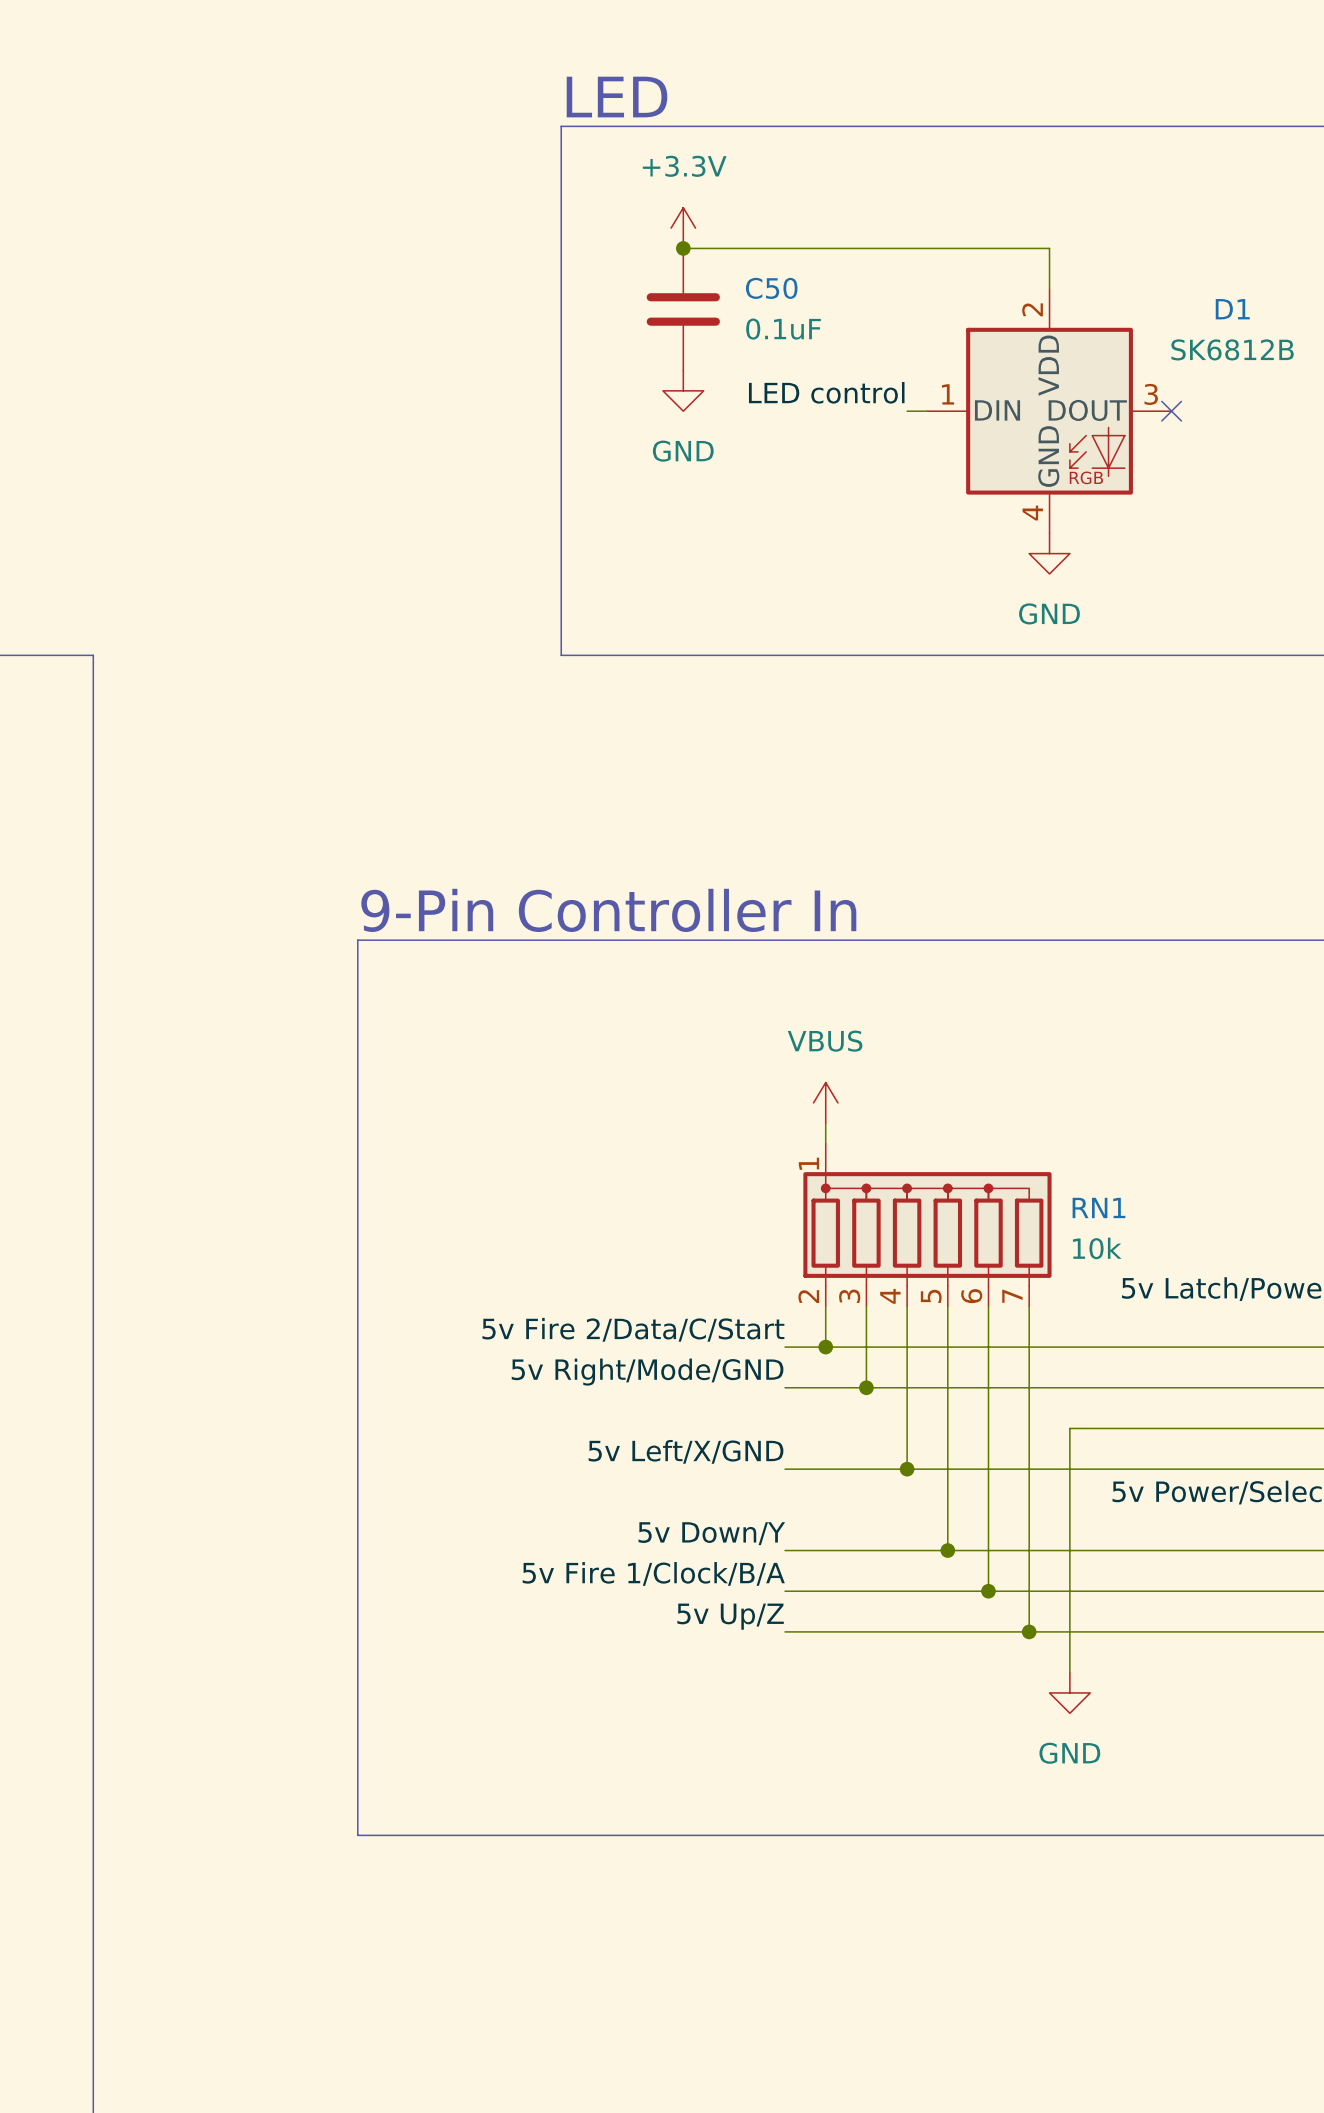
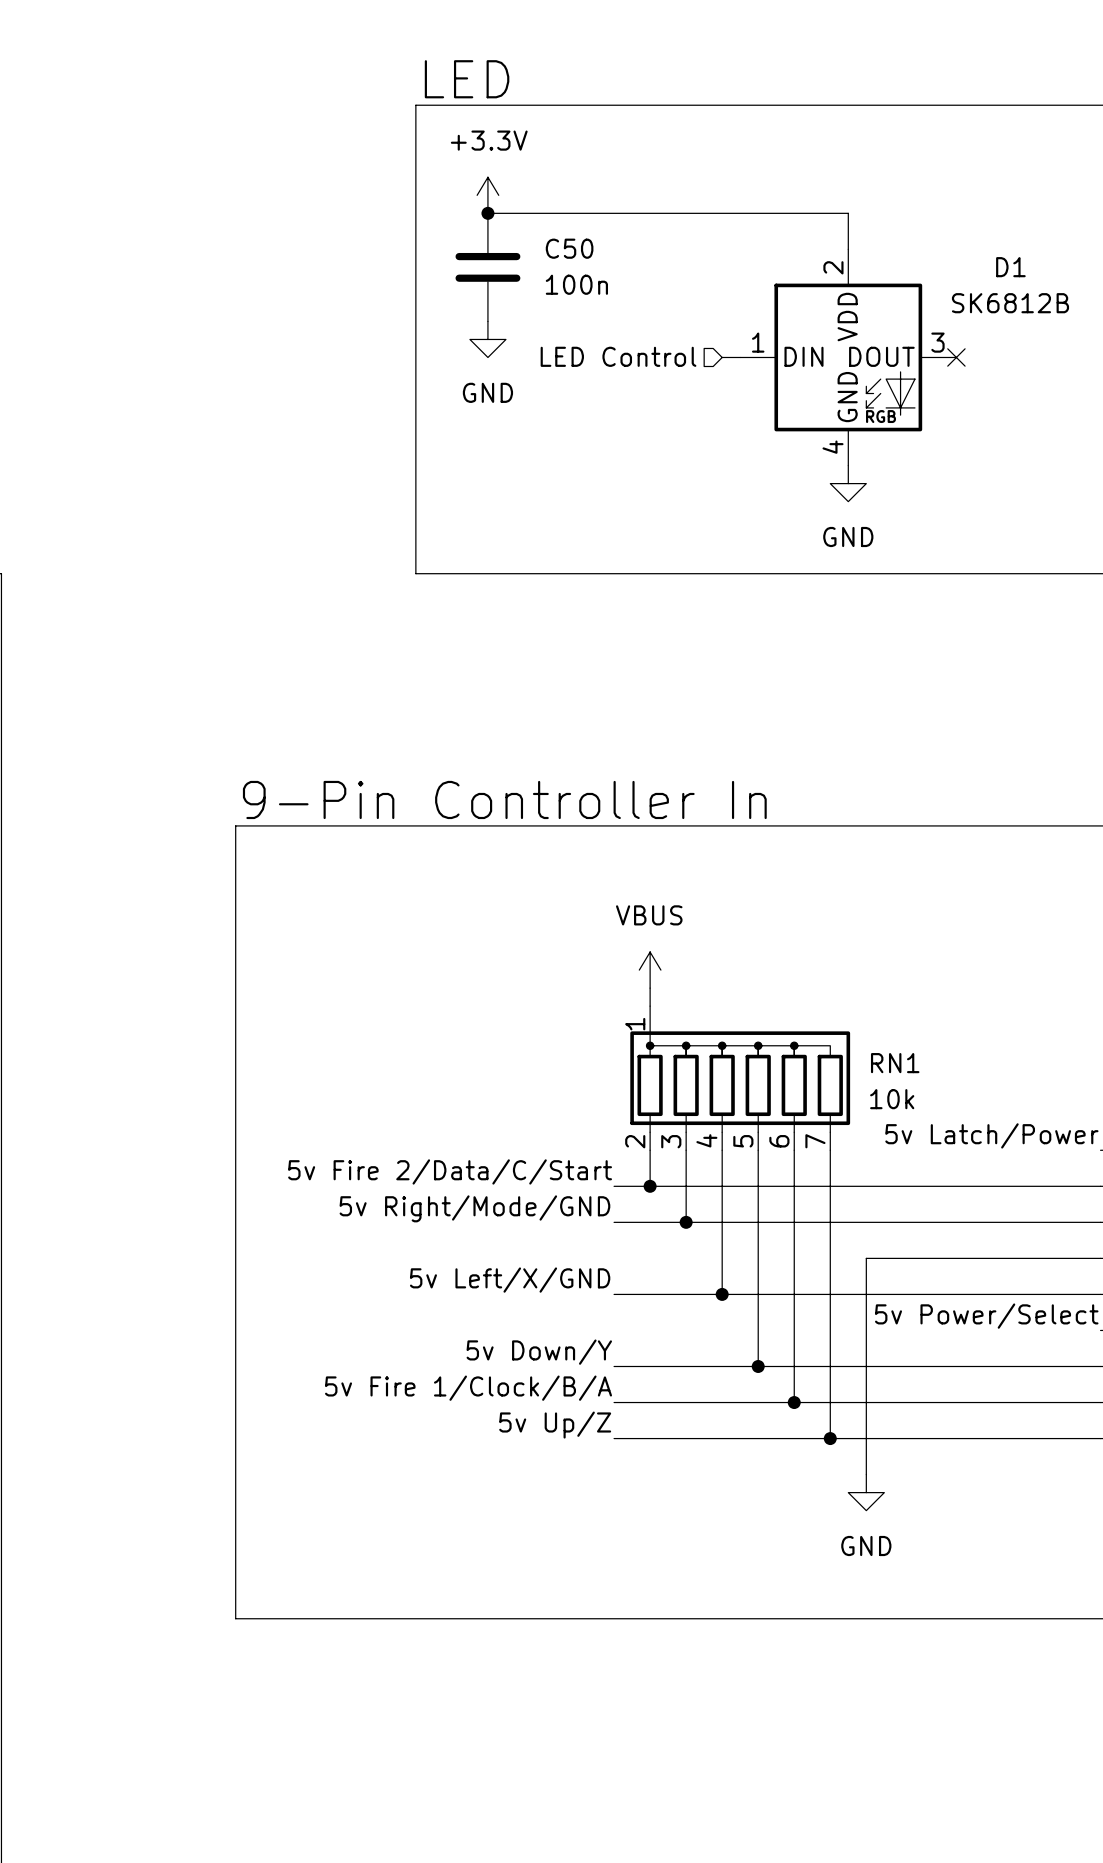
power symbol position: +3.3V (683, 228) -> +3.3V (487, 195)
wire: none -> (487, 213) (523, 213)
junction position: (683, 248) -> (487, 213)
C50 position: (683, 309) -> (487, 267)
C50 value: 0.1uF (783, 329) -> 100n (576, 284)
power symbol position: GND (683, 390) -> GND (487, 339)
label: LED control (826, 392) -> none
hierarchical label: none -> LED Control (618, 356)

